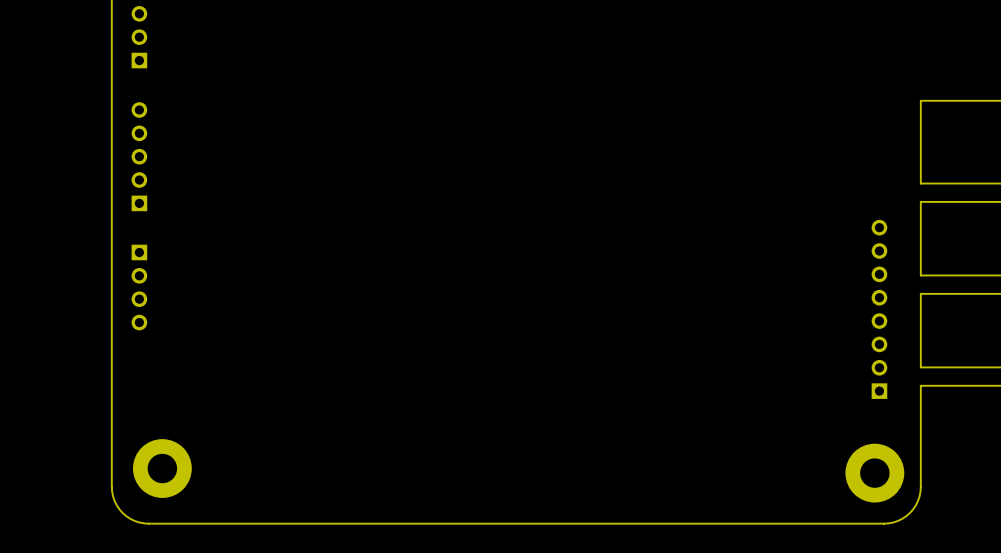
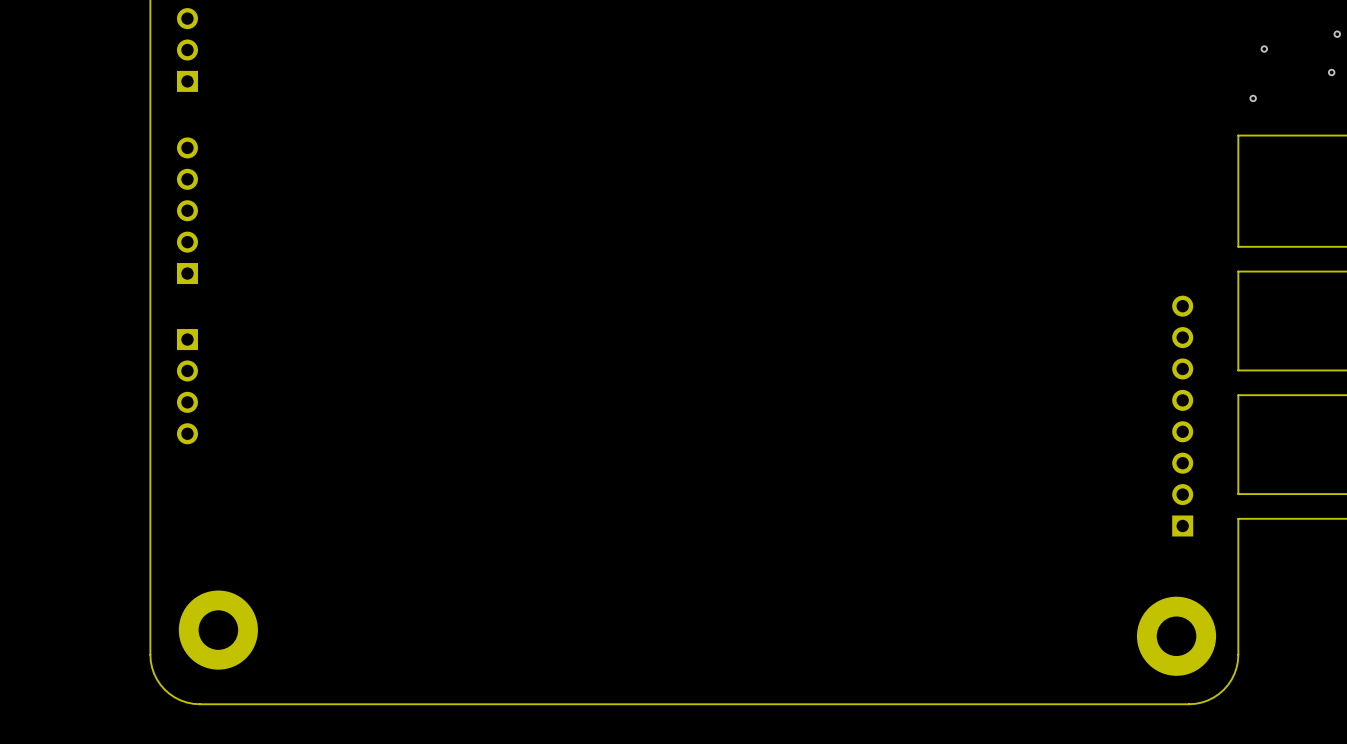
via: none -> (1337, 34)
via: none -> (1264, 49)
via: none -> (1331, 72)
via: none -> (1253, 98)

